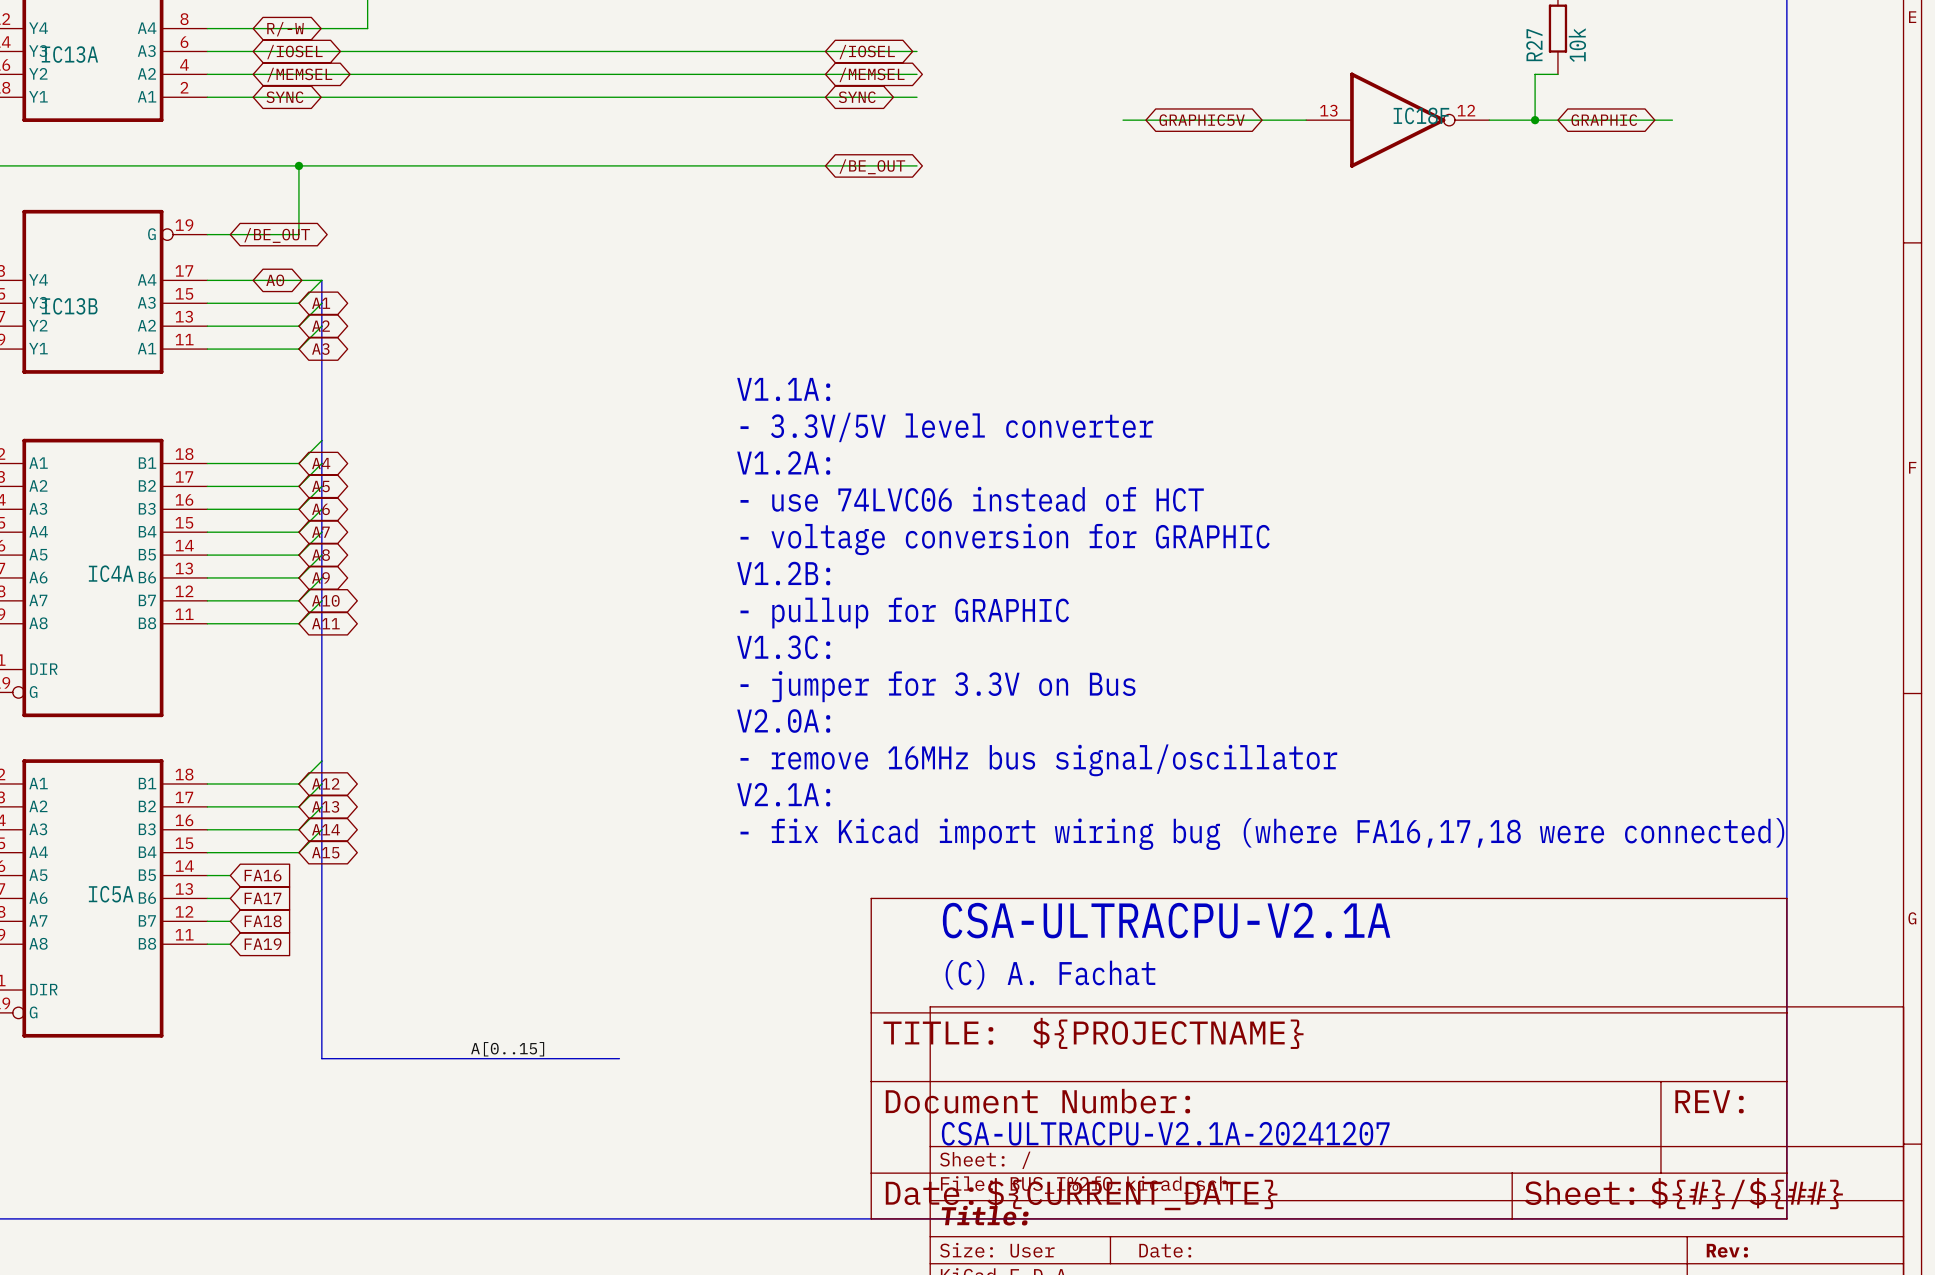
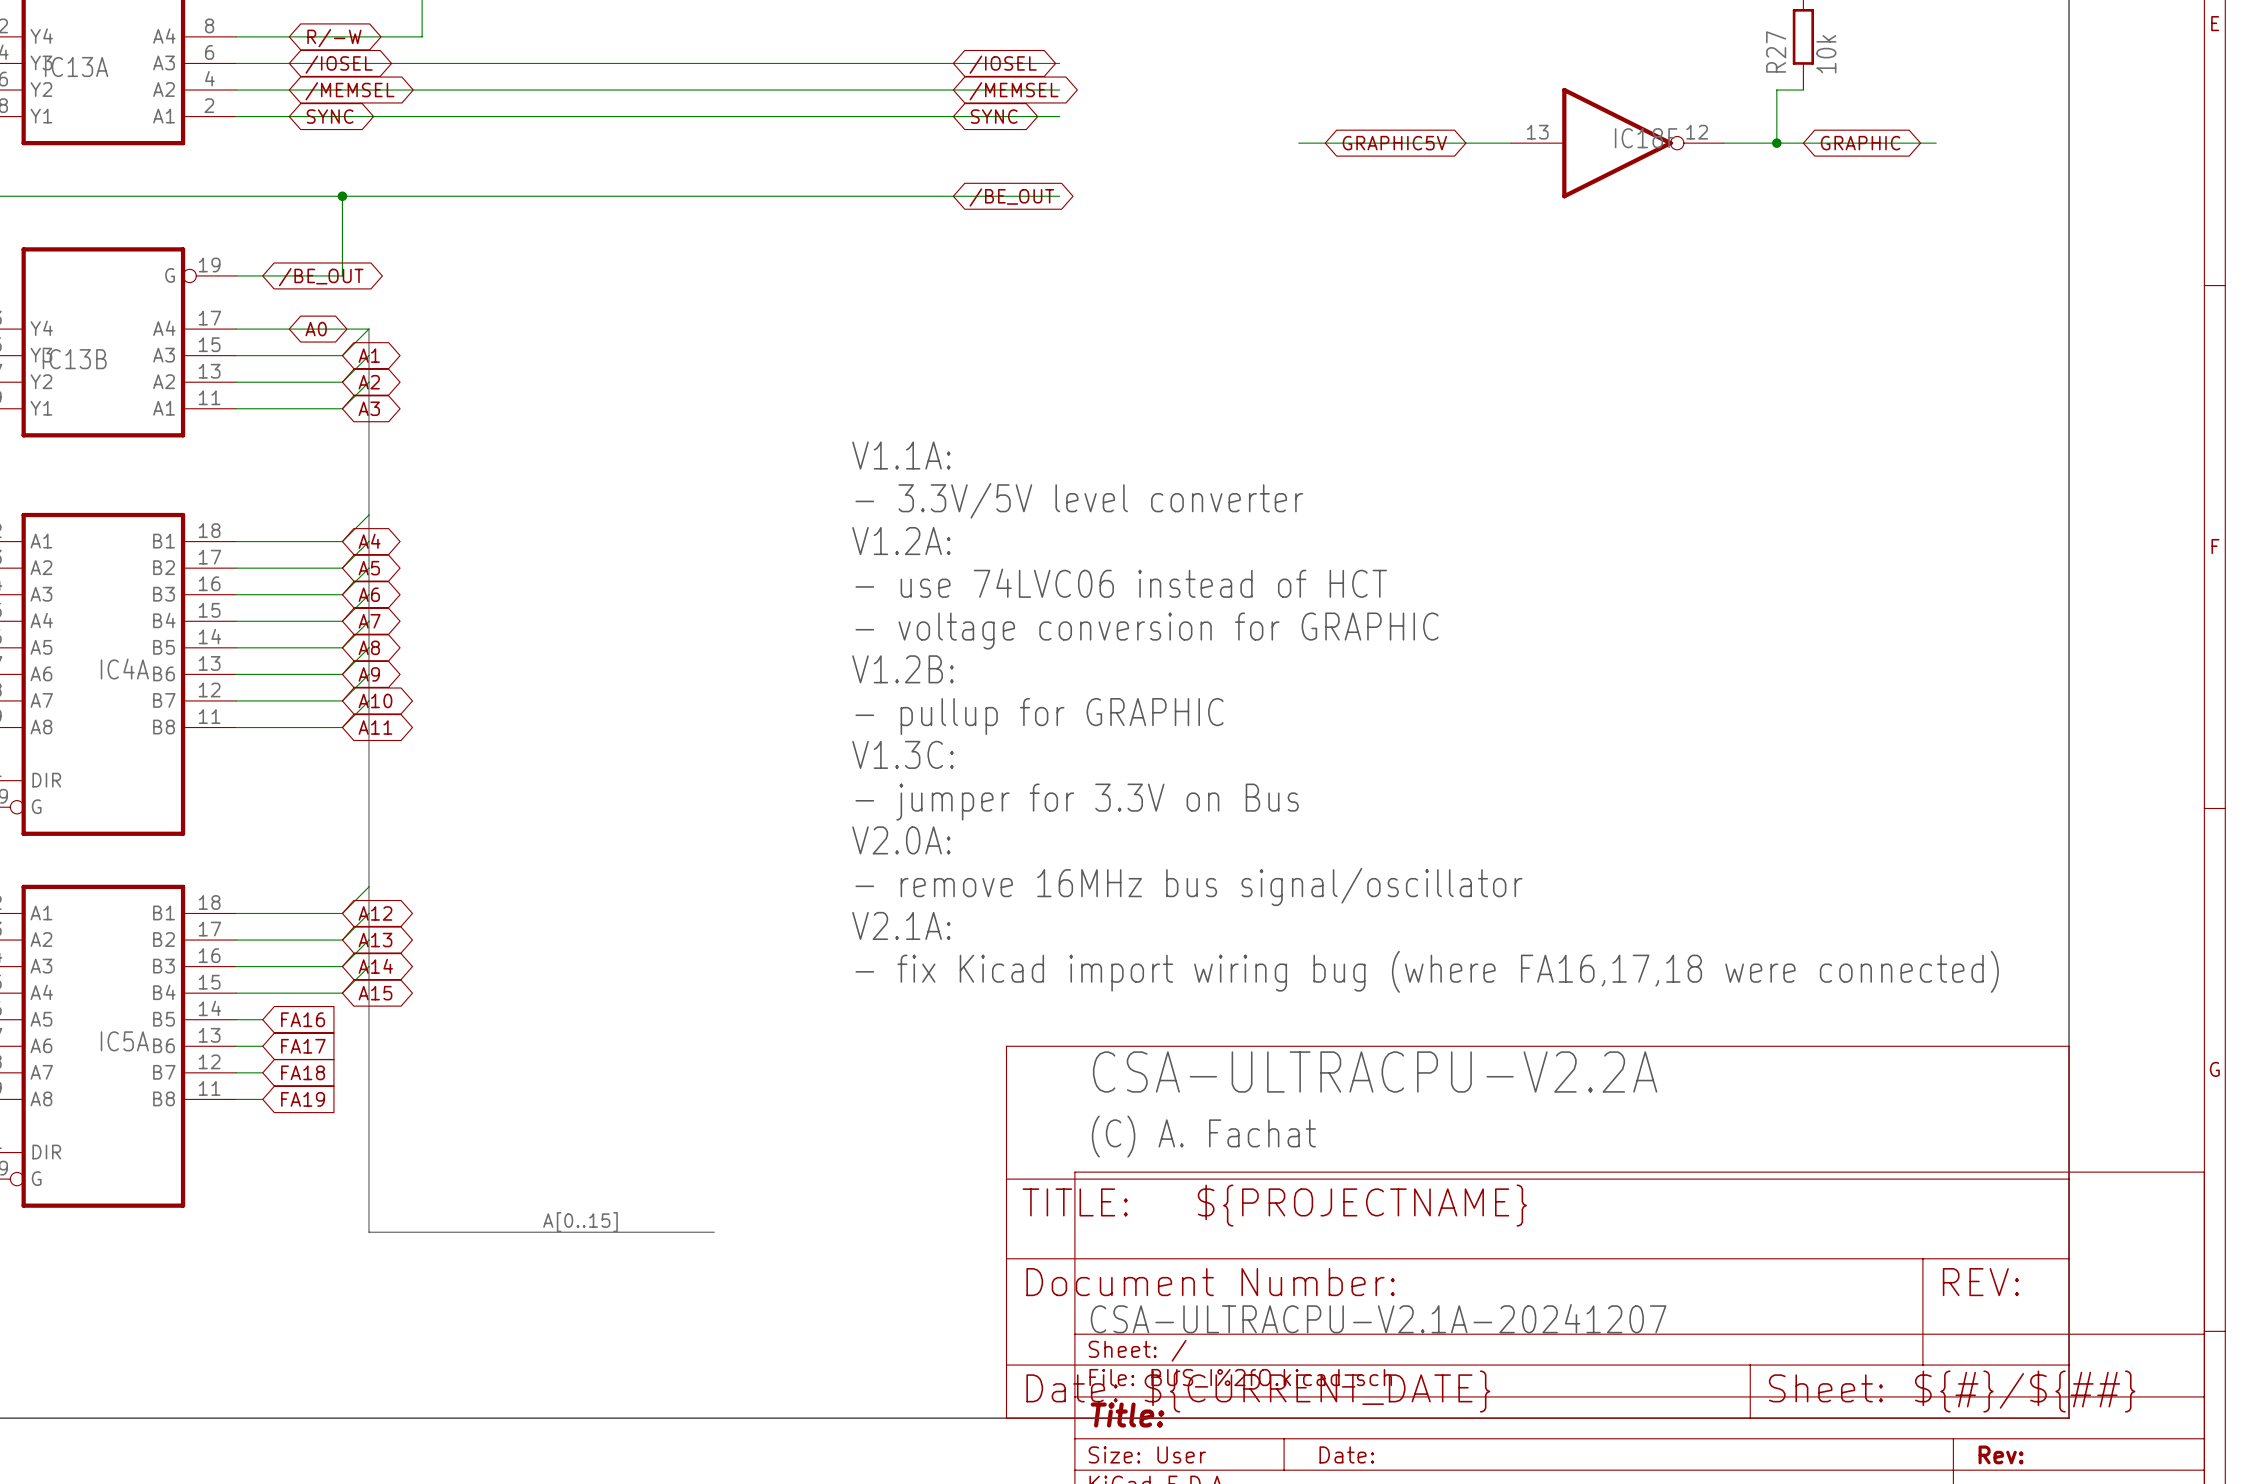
text: CSA-ULTRACPU-V2.1A (1166, 920) -> CSA-ULTRACPU-V2.2A (1375, 1071)

